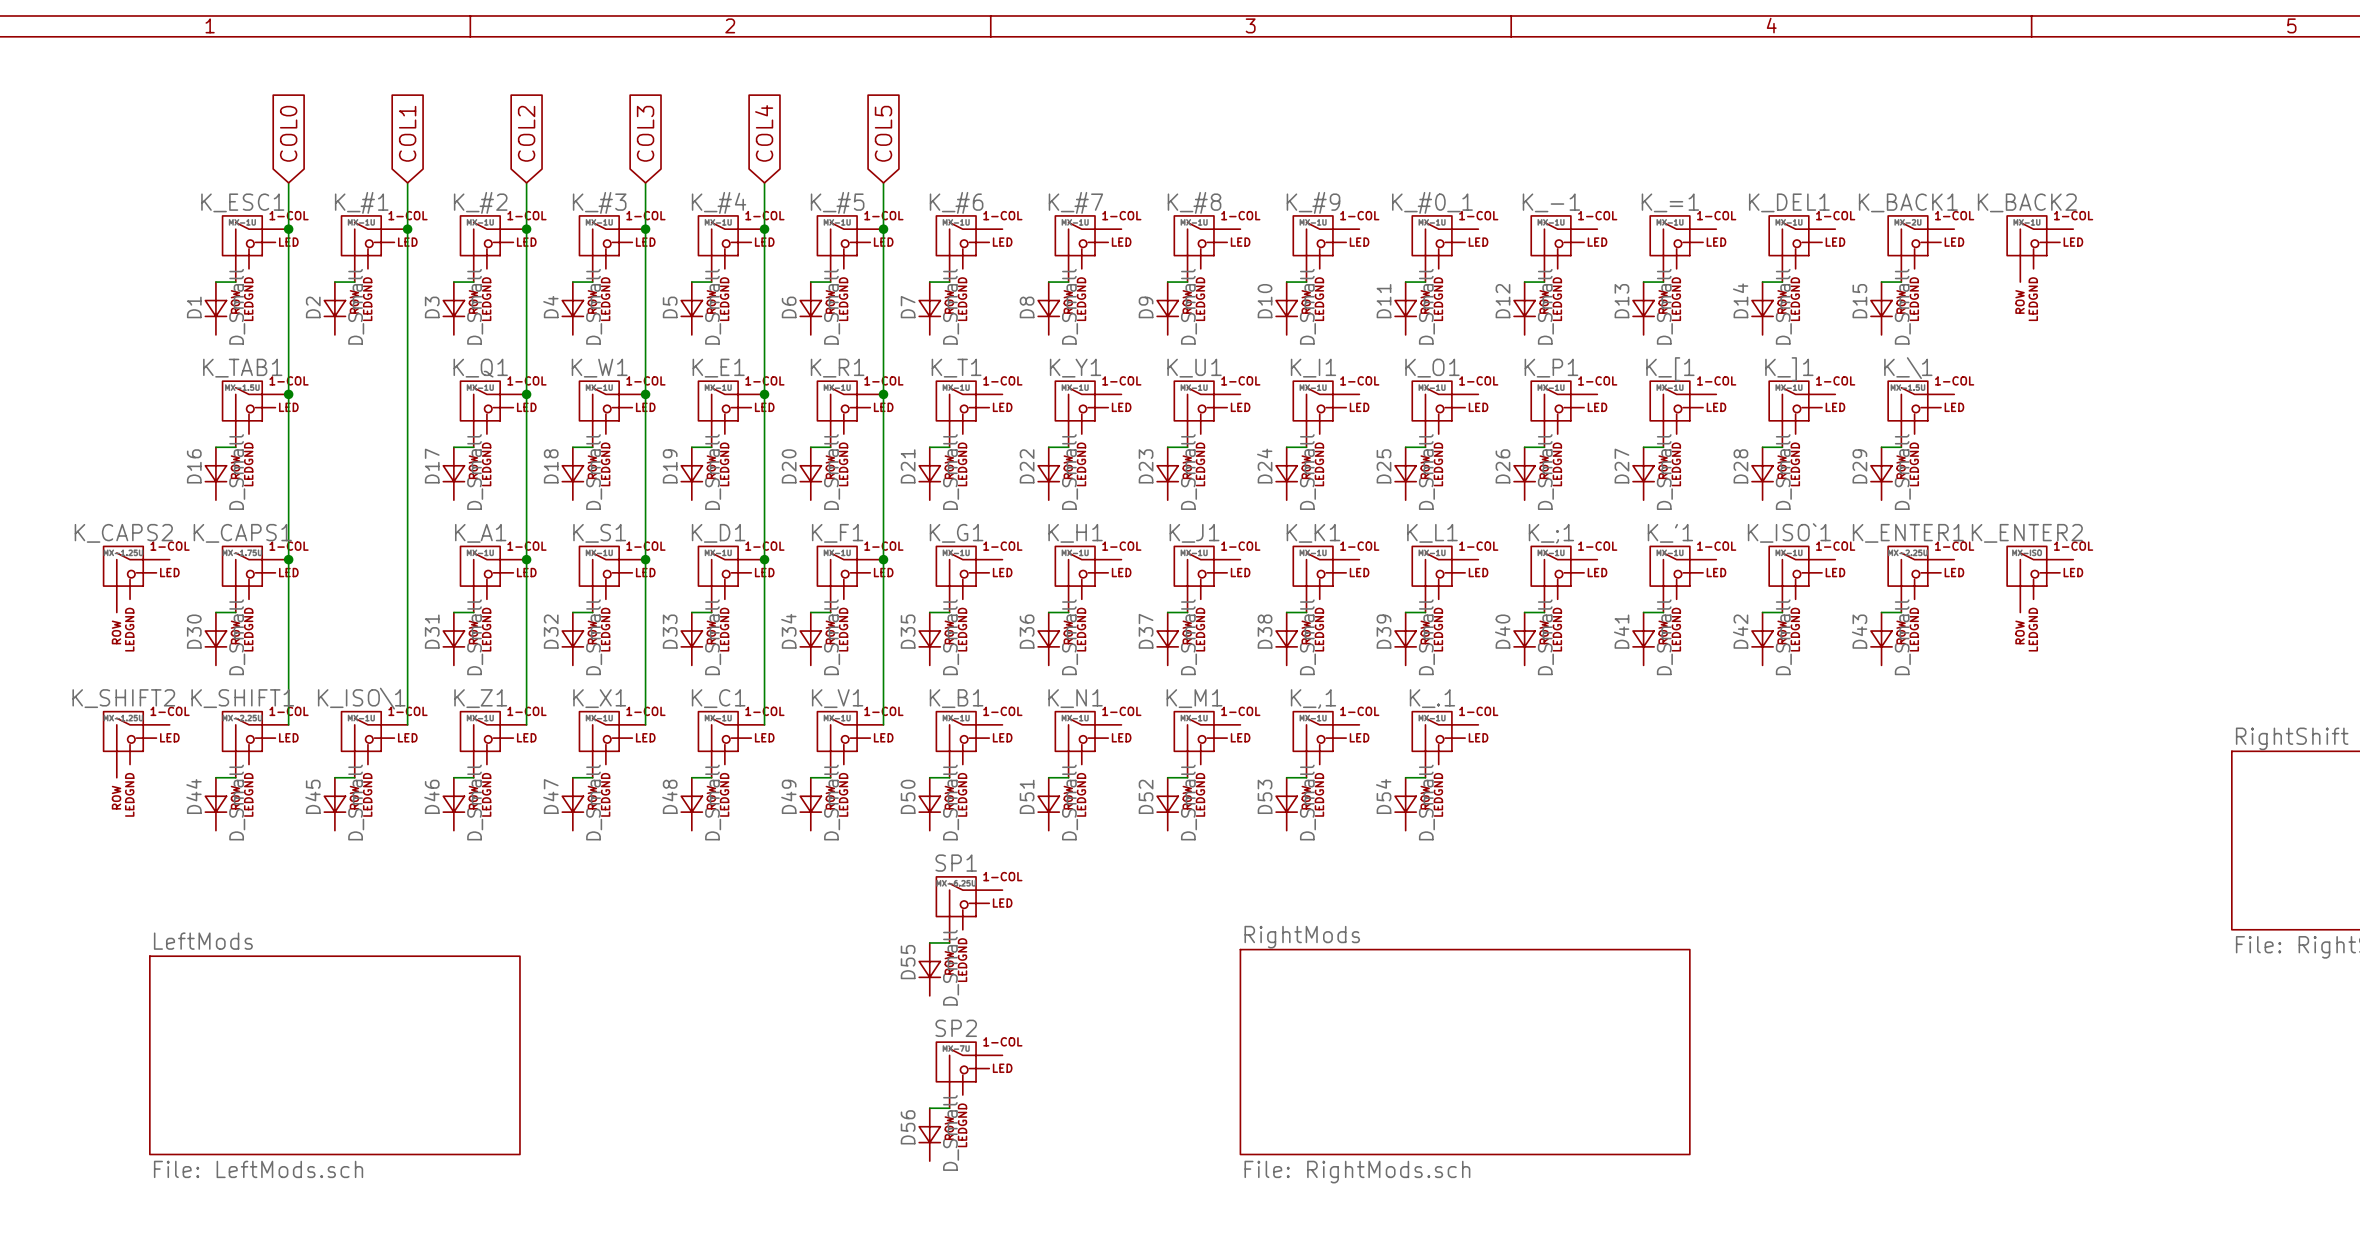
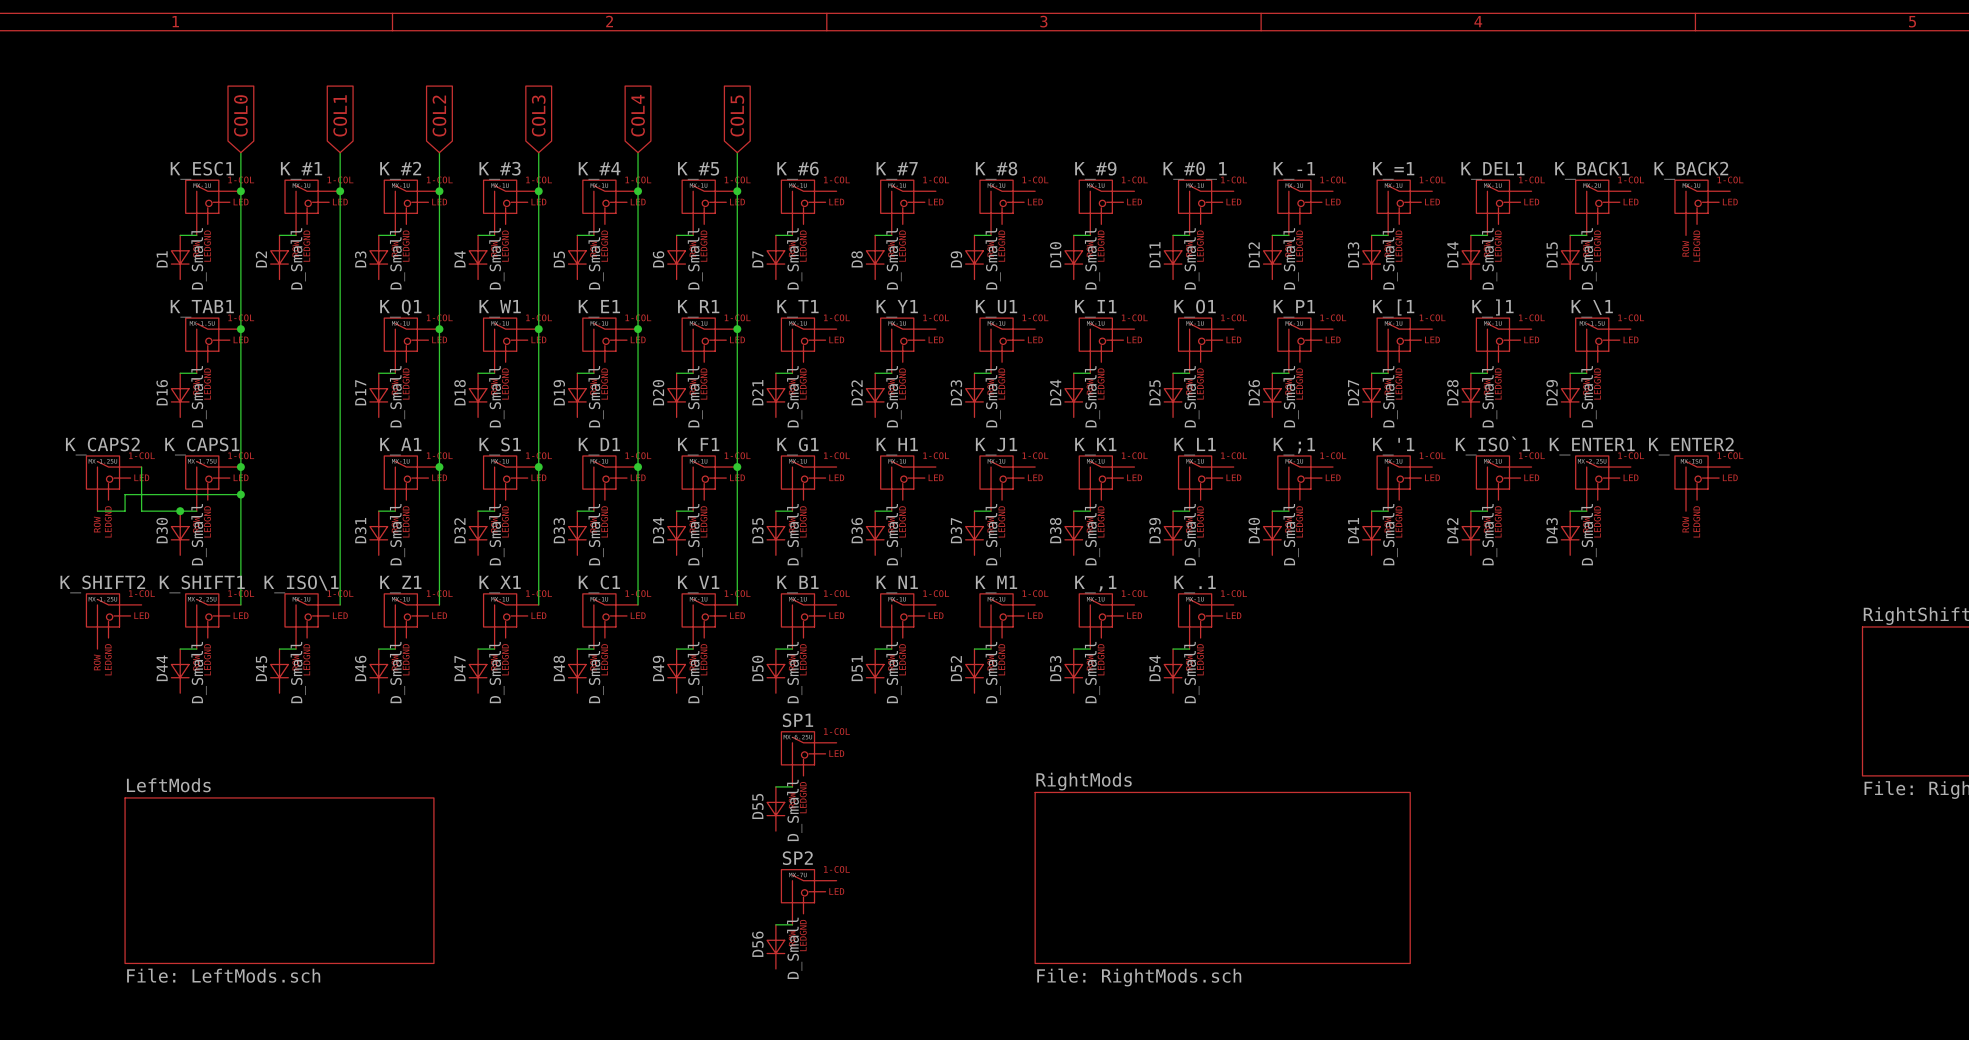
wire: none -> (141, 467) (141, 511) (180, 511)
wire: none -> (240, 494) (125, 494) (125, 511) (97, 511)
junction: none -> (240, 494)
junction: none -> (180, 511)

